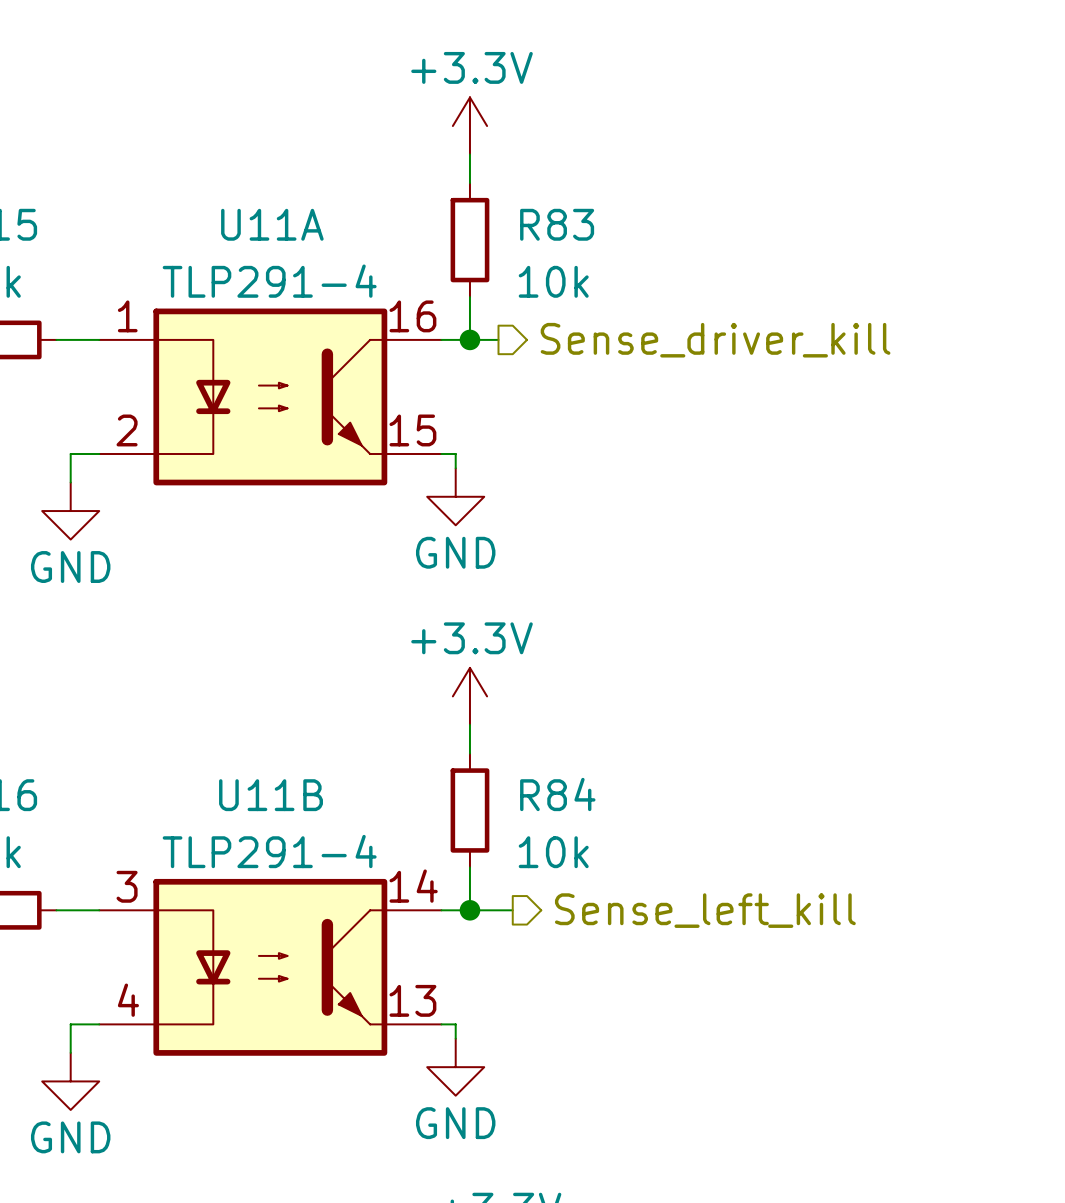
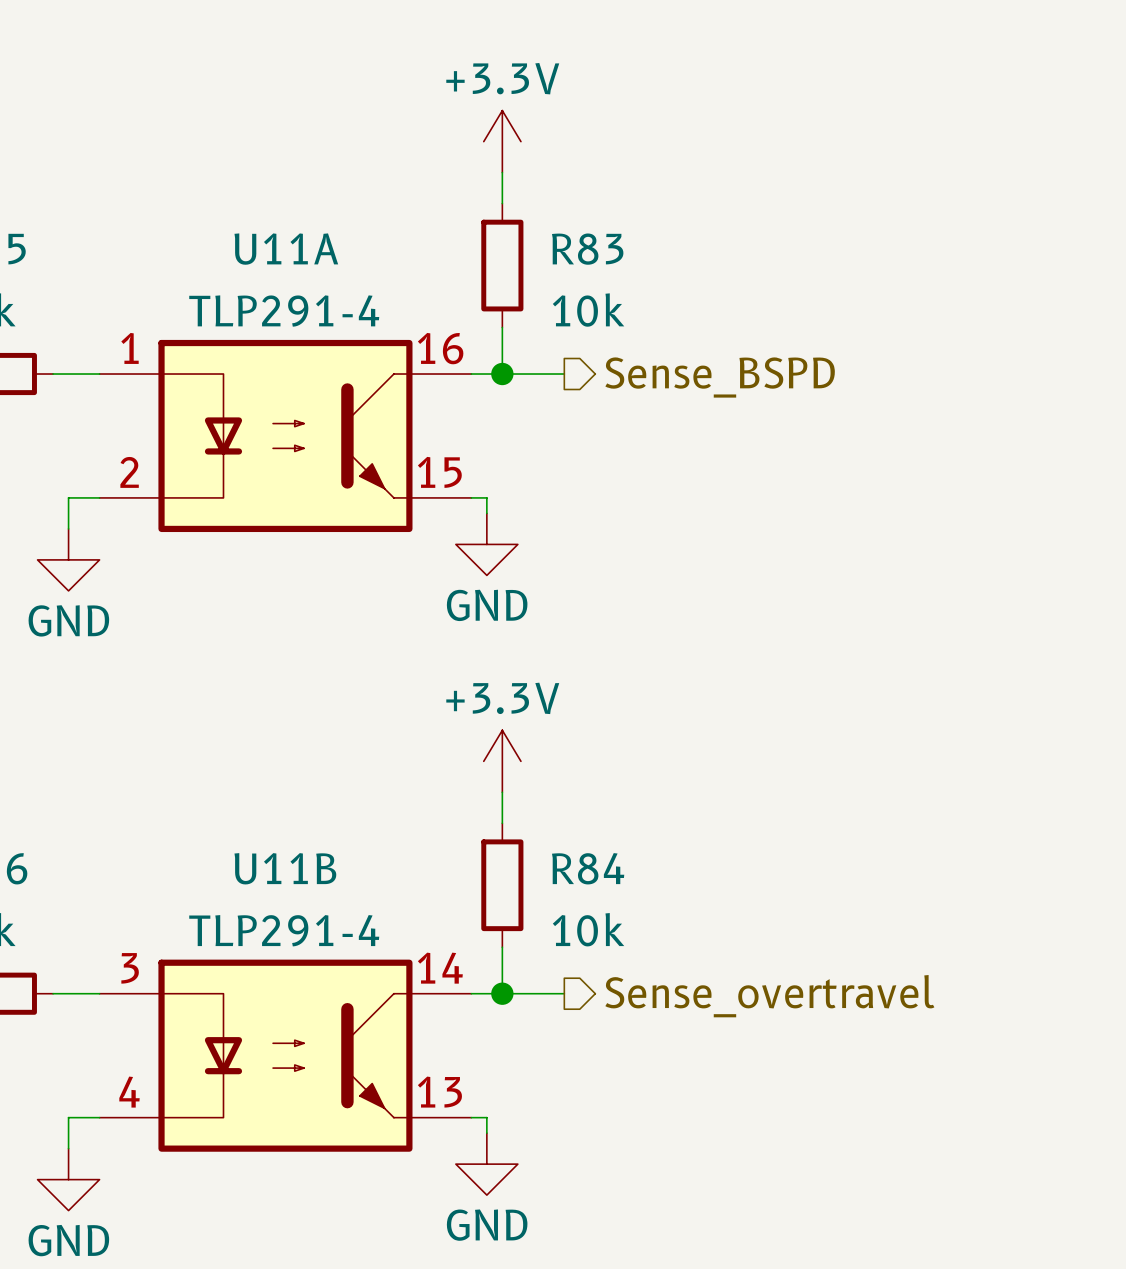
wire: none -> (533, 374) (564, 374)
hierarchical label: none -> Sense_BSPD (720, 377)
hierarchical label: Sense_driver_kill (715, 340) -> none
wire: none -> (548, 993) (564, 993)
hierarchical label: Sense_left_kill (705, 910) -> Sense_overtravel (769, 996)

